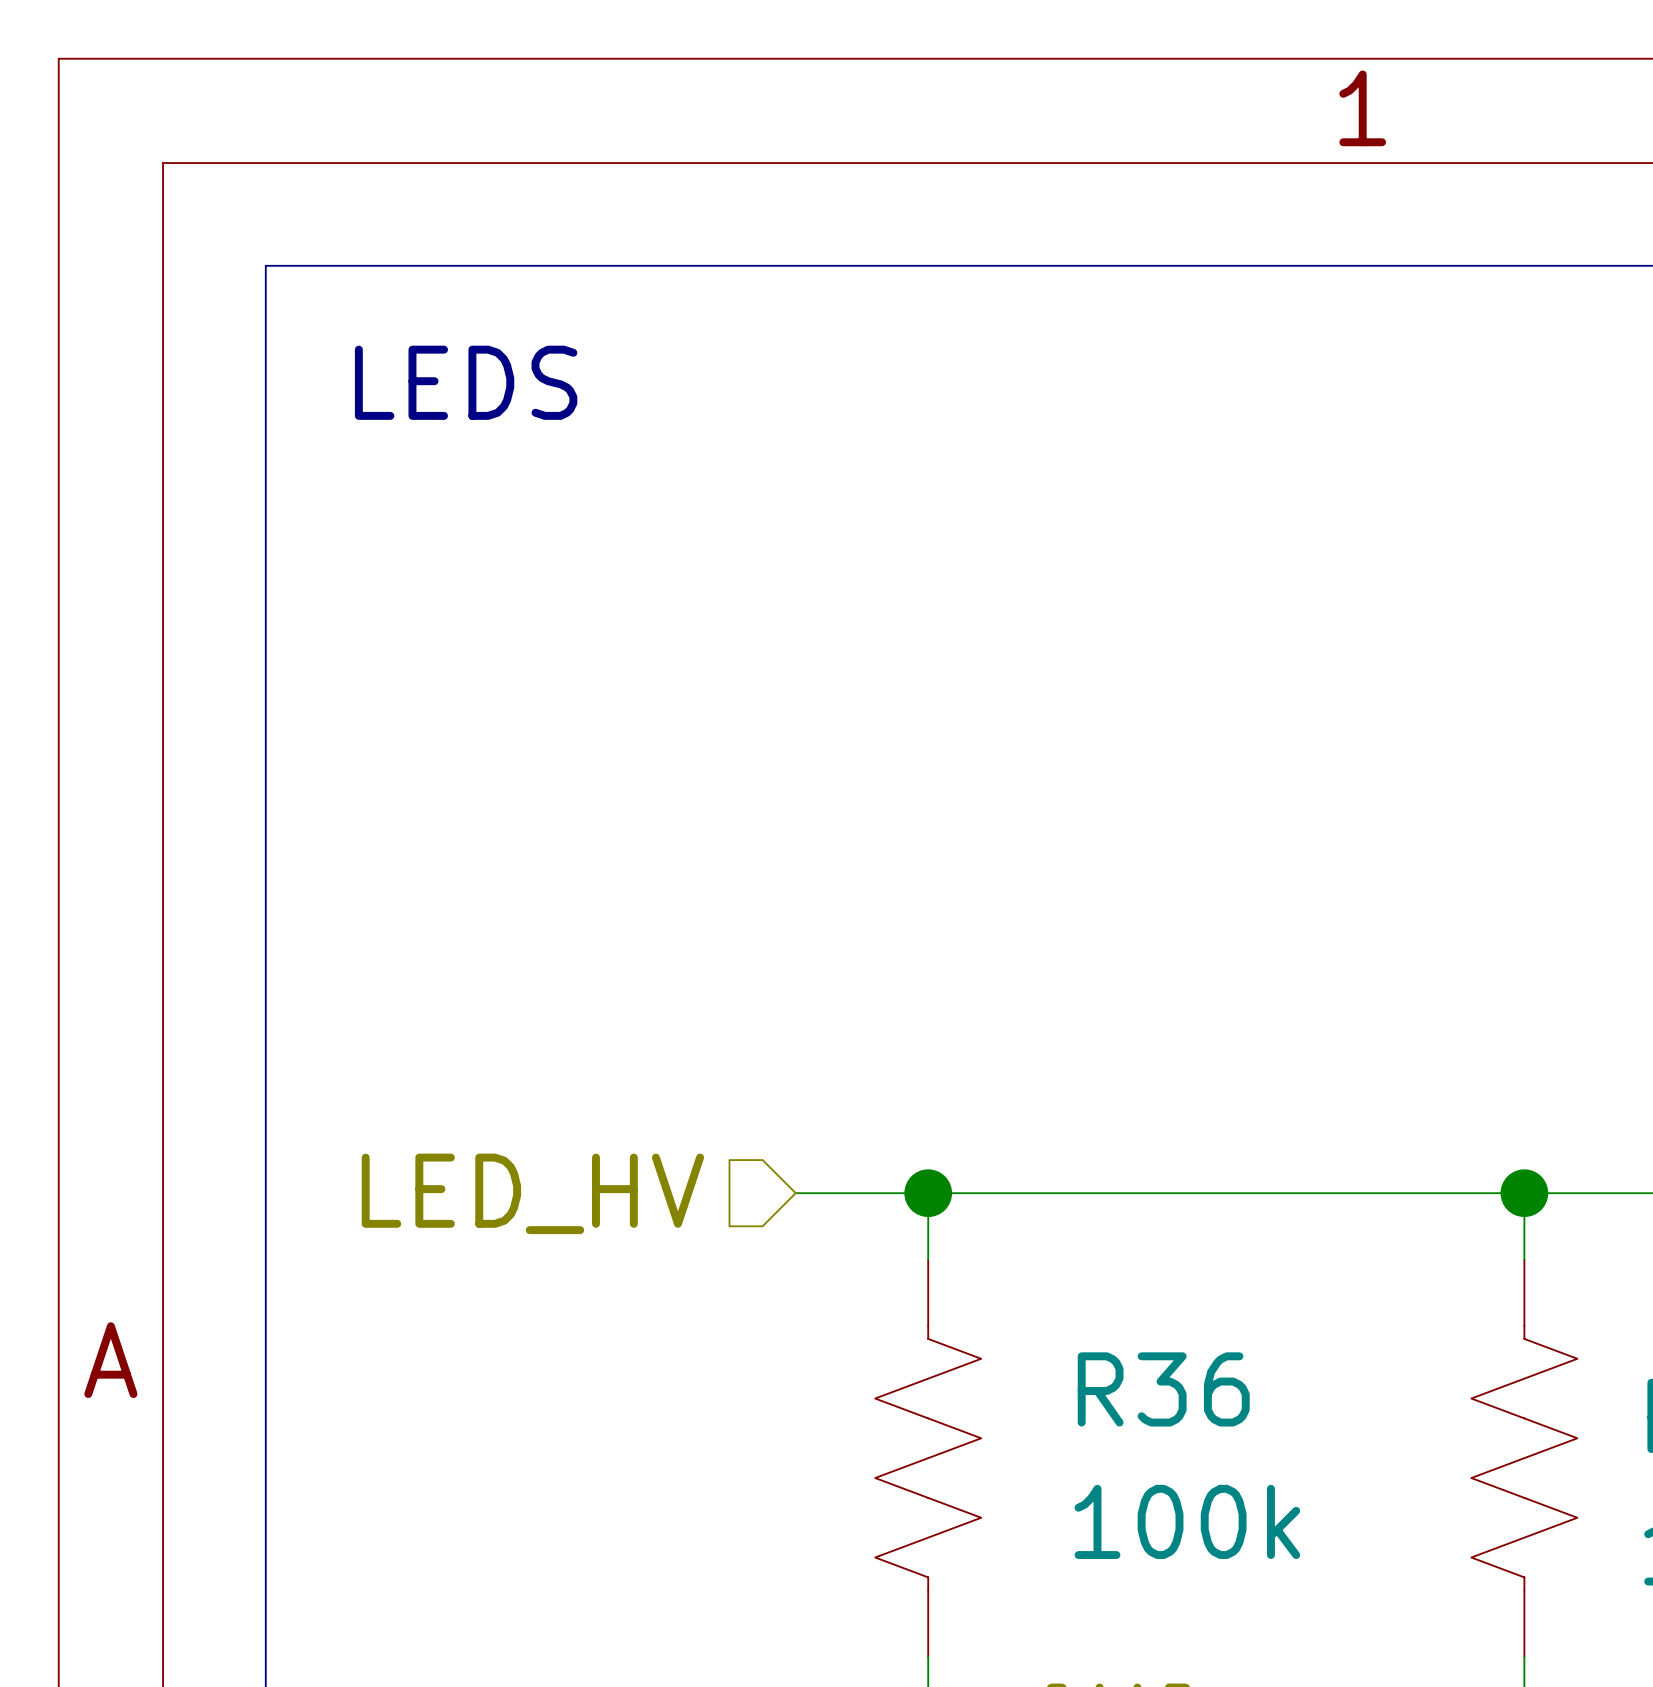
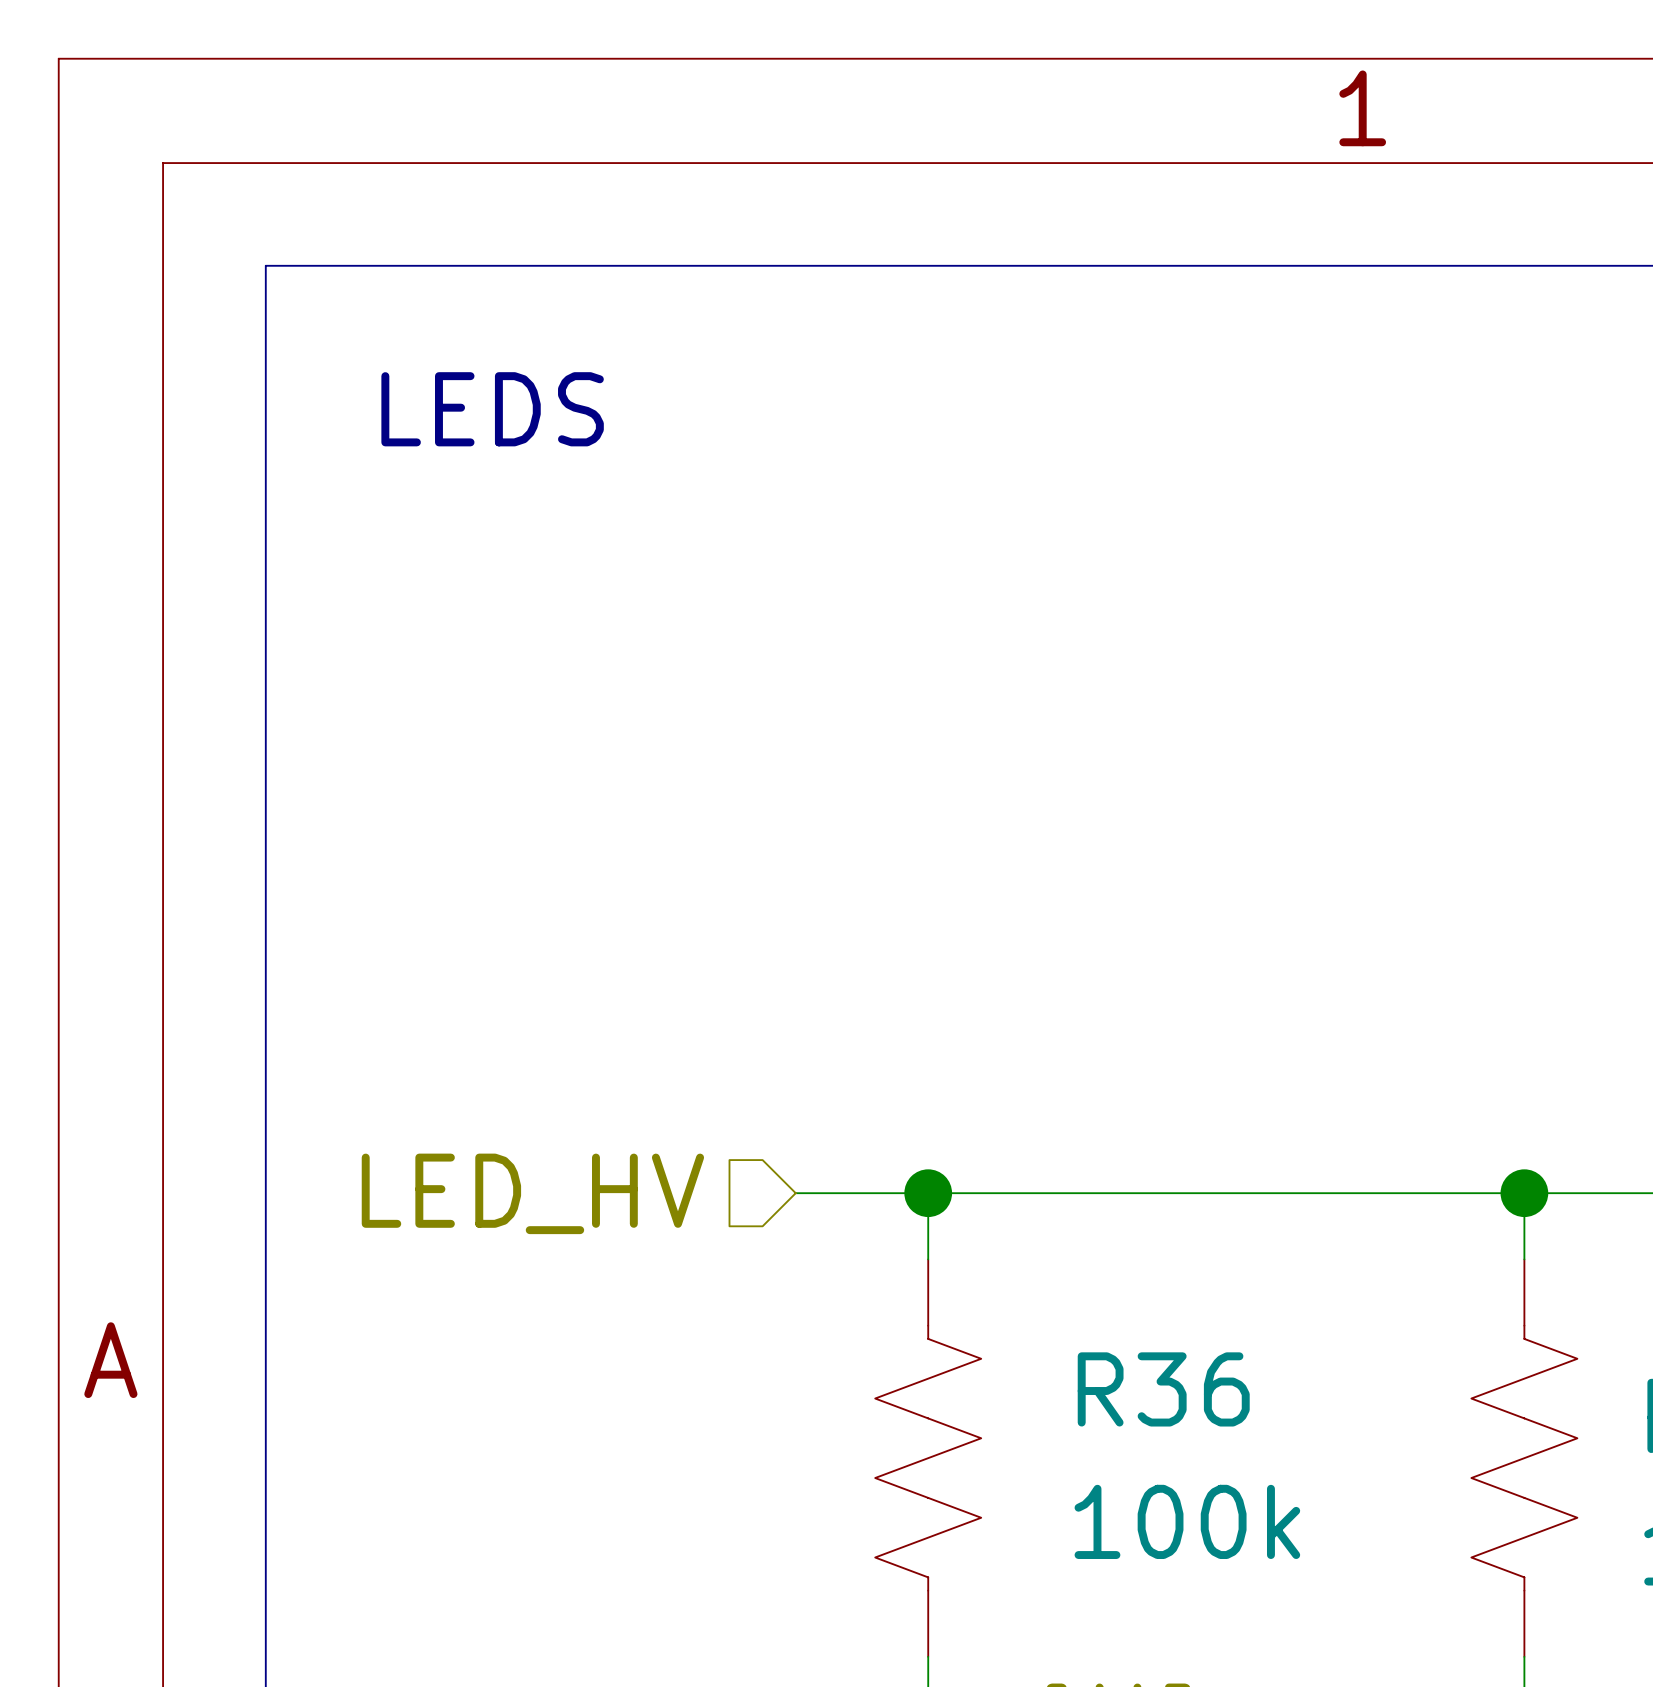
text position: LEDS (466, 382) -> LEDS (492, 409)

